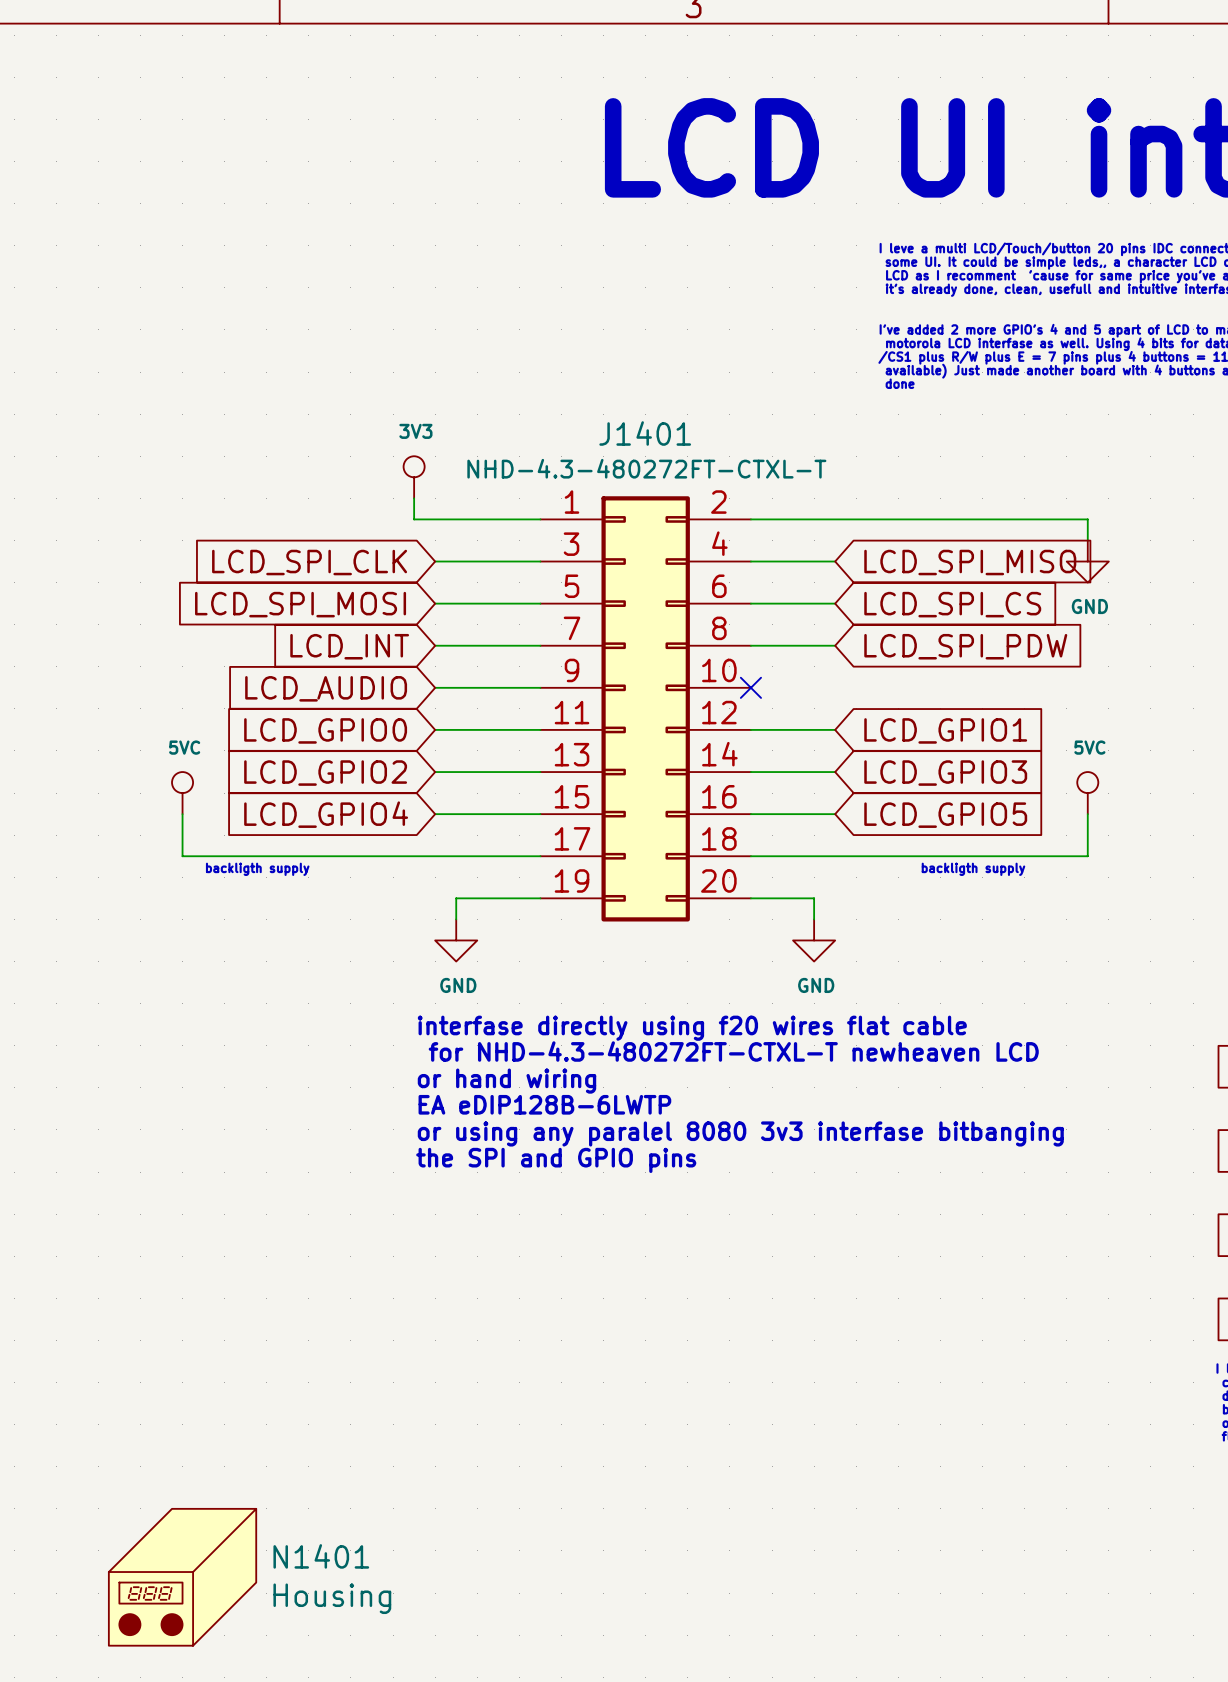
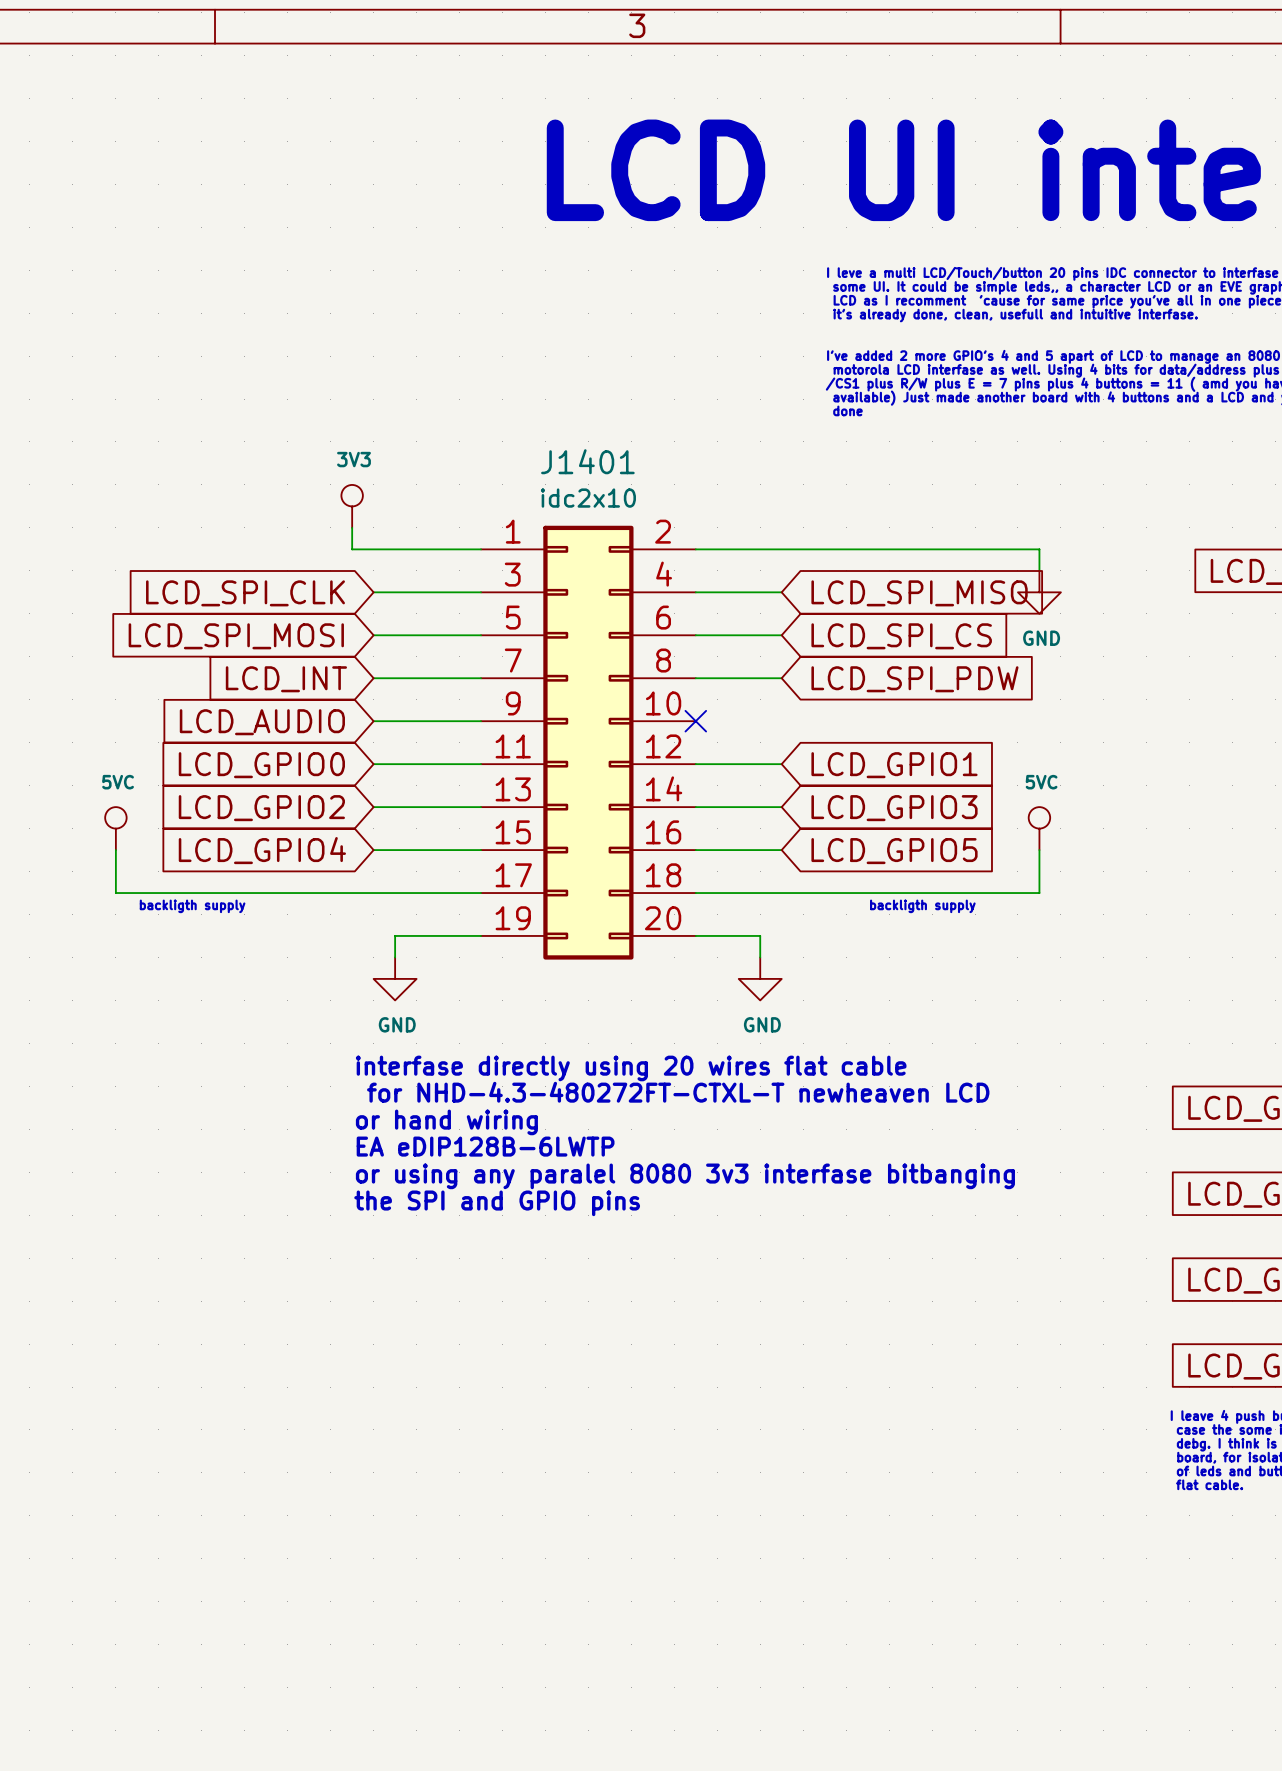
J1401 value: NHD-4.3-480272FT-CTXL-T (646, 468) -> idc2x10 (588, 498)
text: interfase directly using f20 wires flat cable (692, 1028) -> interfase directly using 20 wires flat cable (631, 1068)
N1401: Housing (182, 1577) -> none

